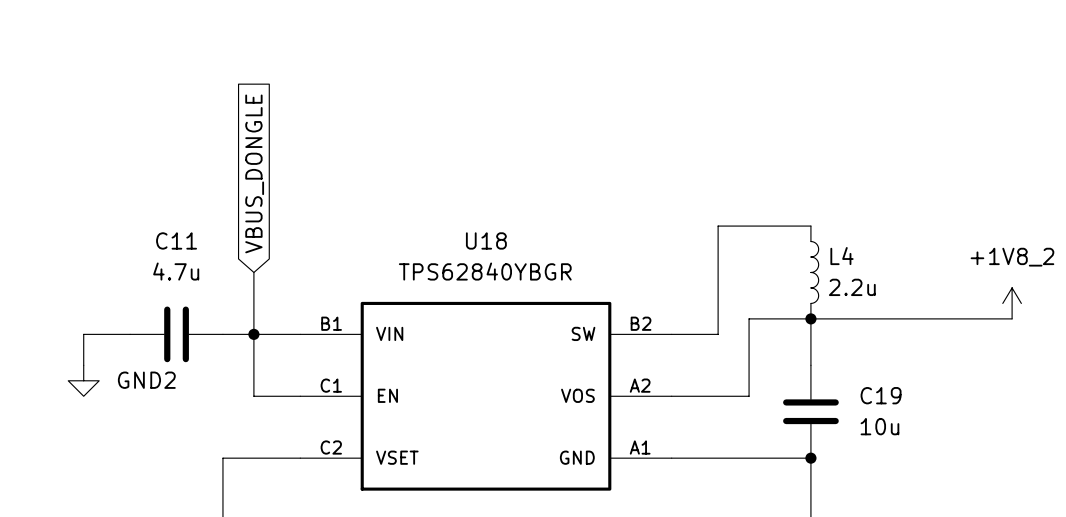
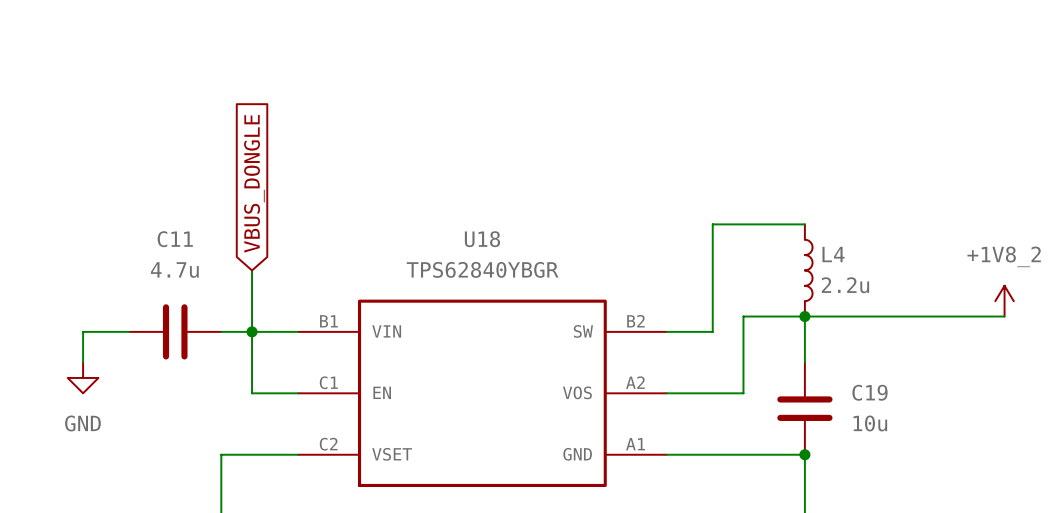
power symbol: GND2 (83, 380) -> GND (83, 377)

